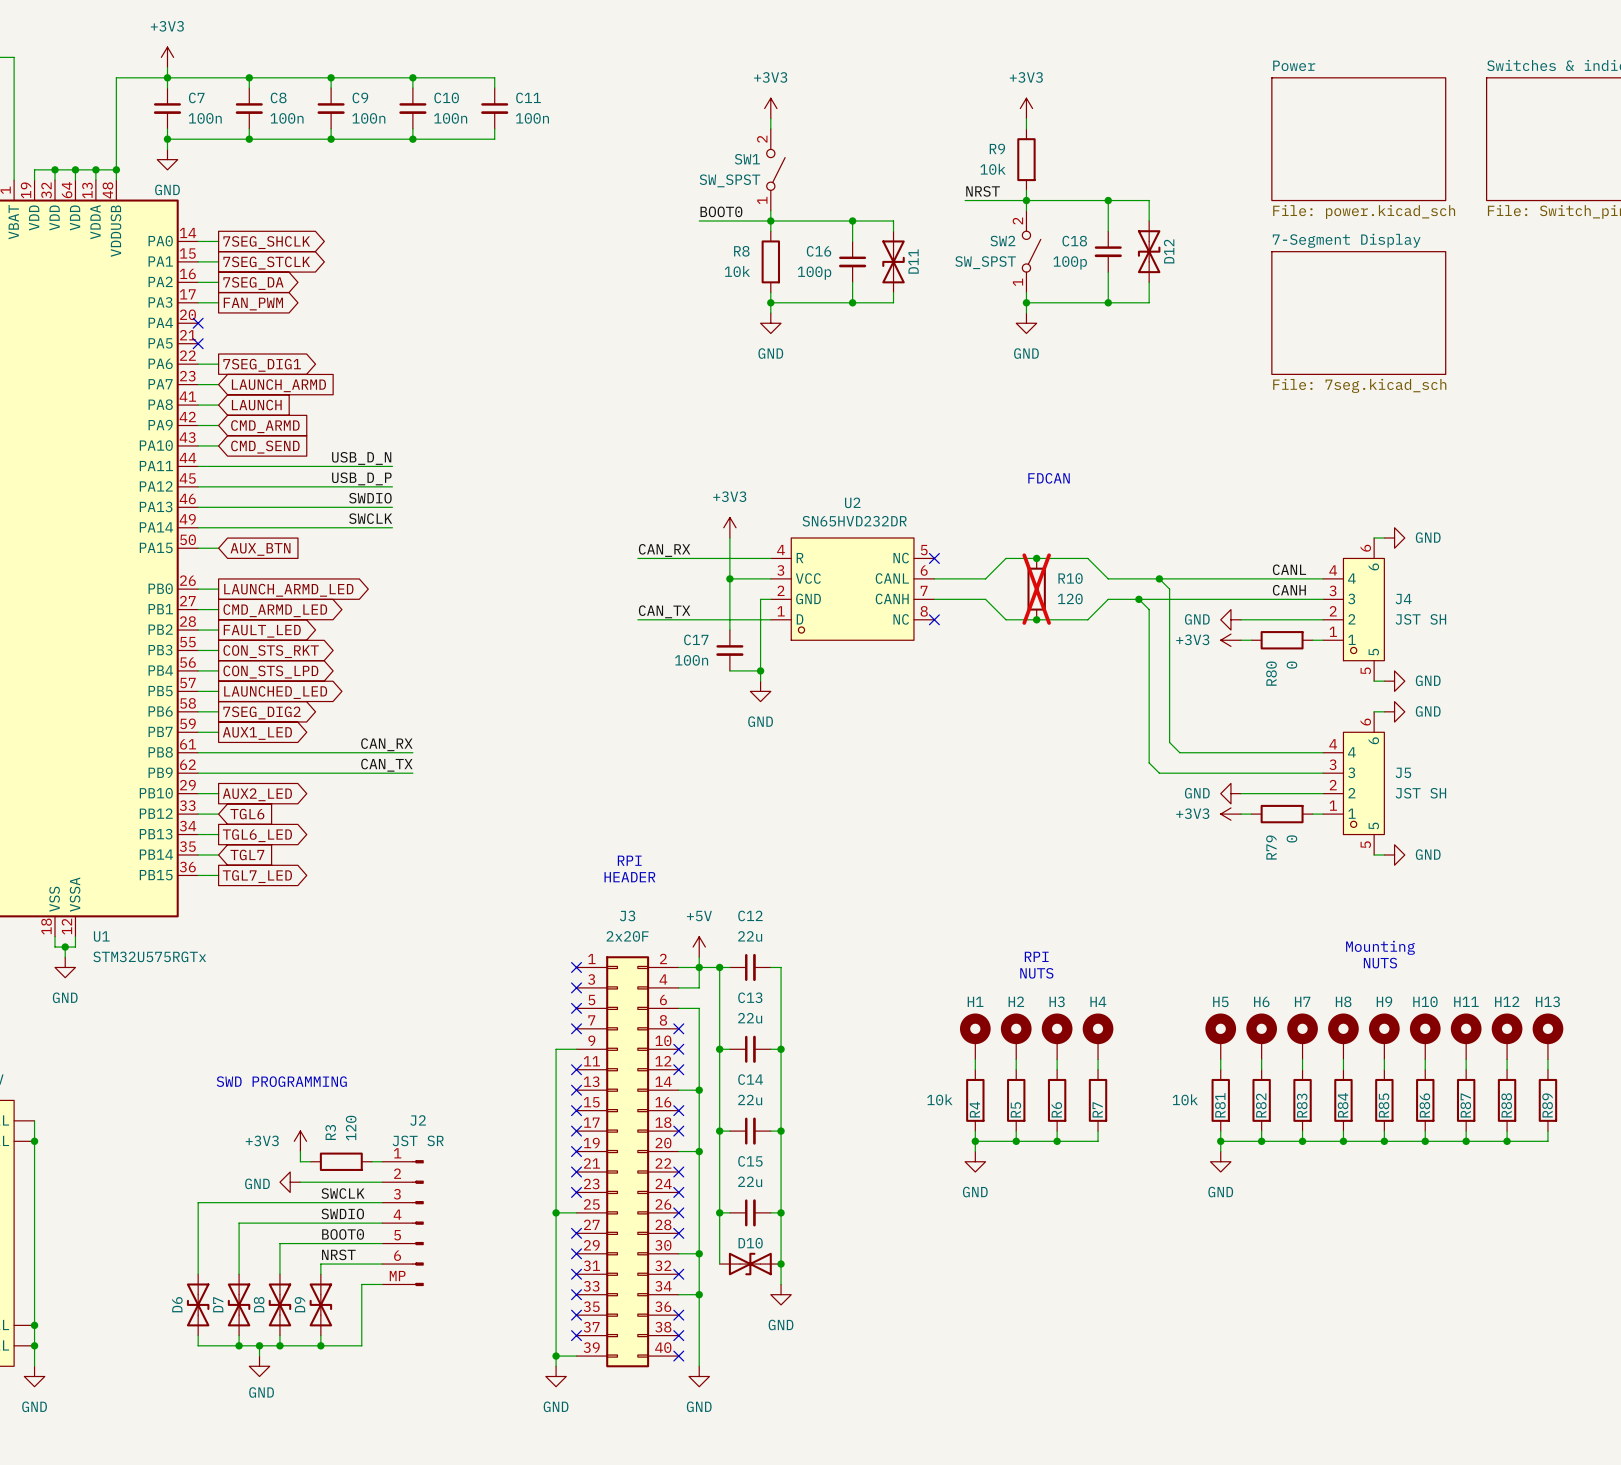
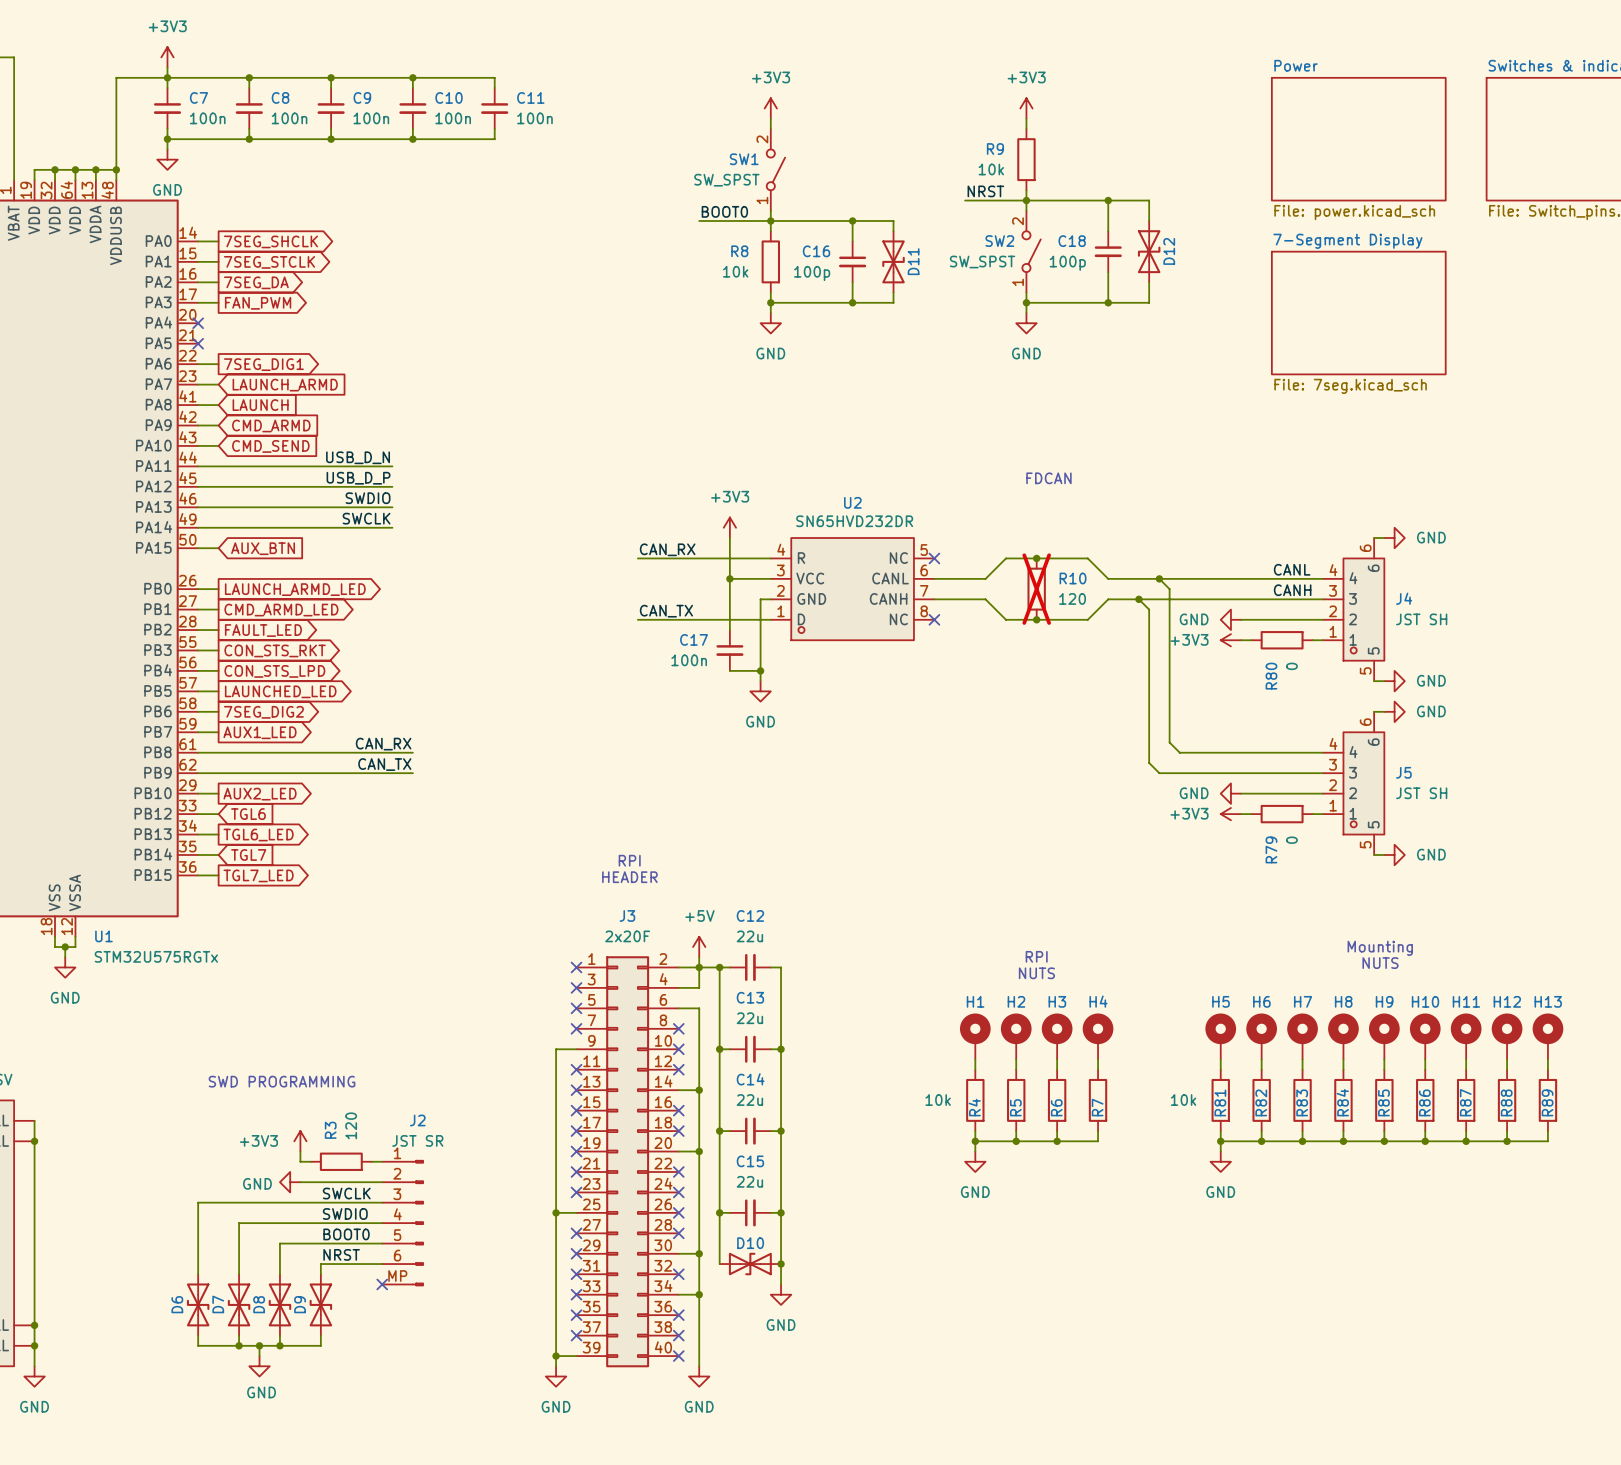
wire: (382, 1284) (361, 1284) (361, 1345) (320, 1345) -> none
no-connect mark: none -> (382, 1284)
junction: (320, 1345) -> none

